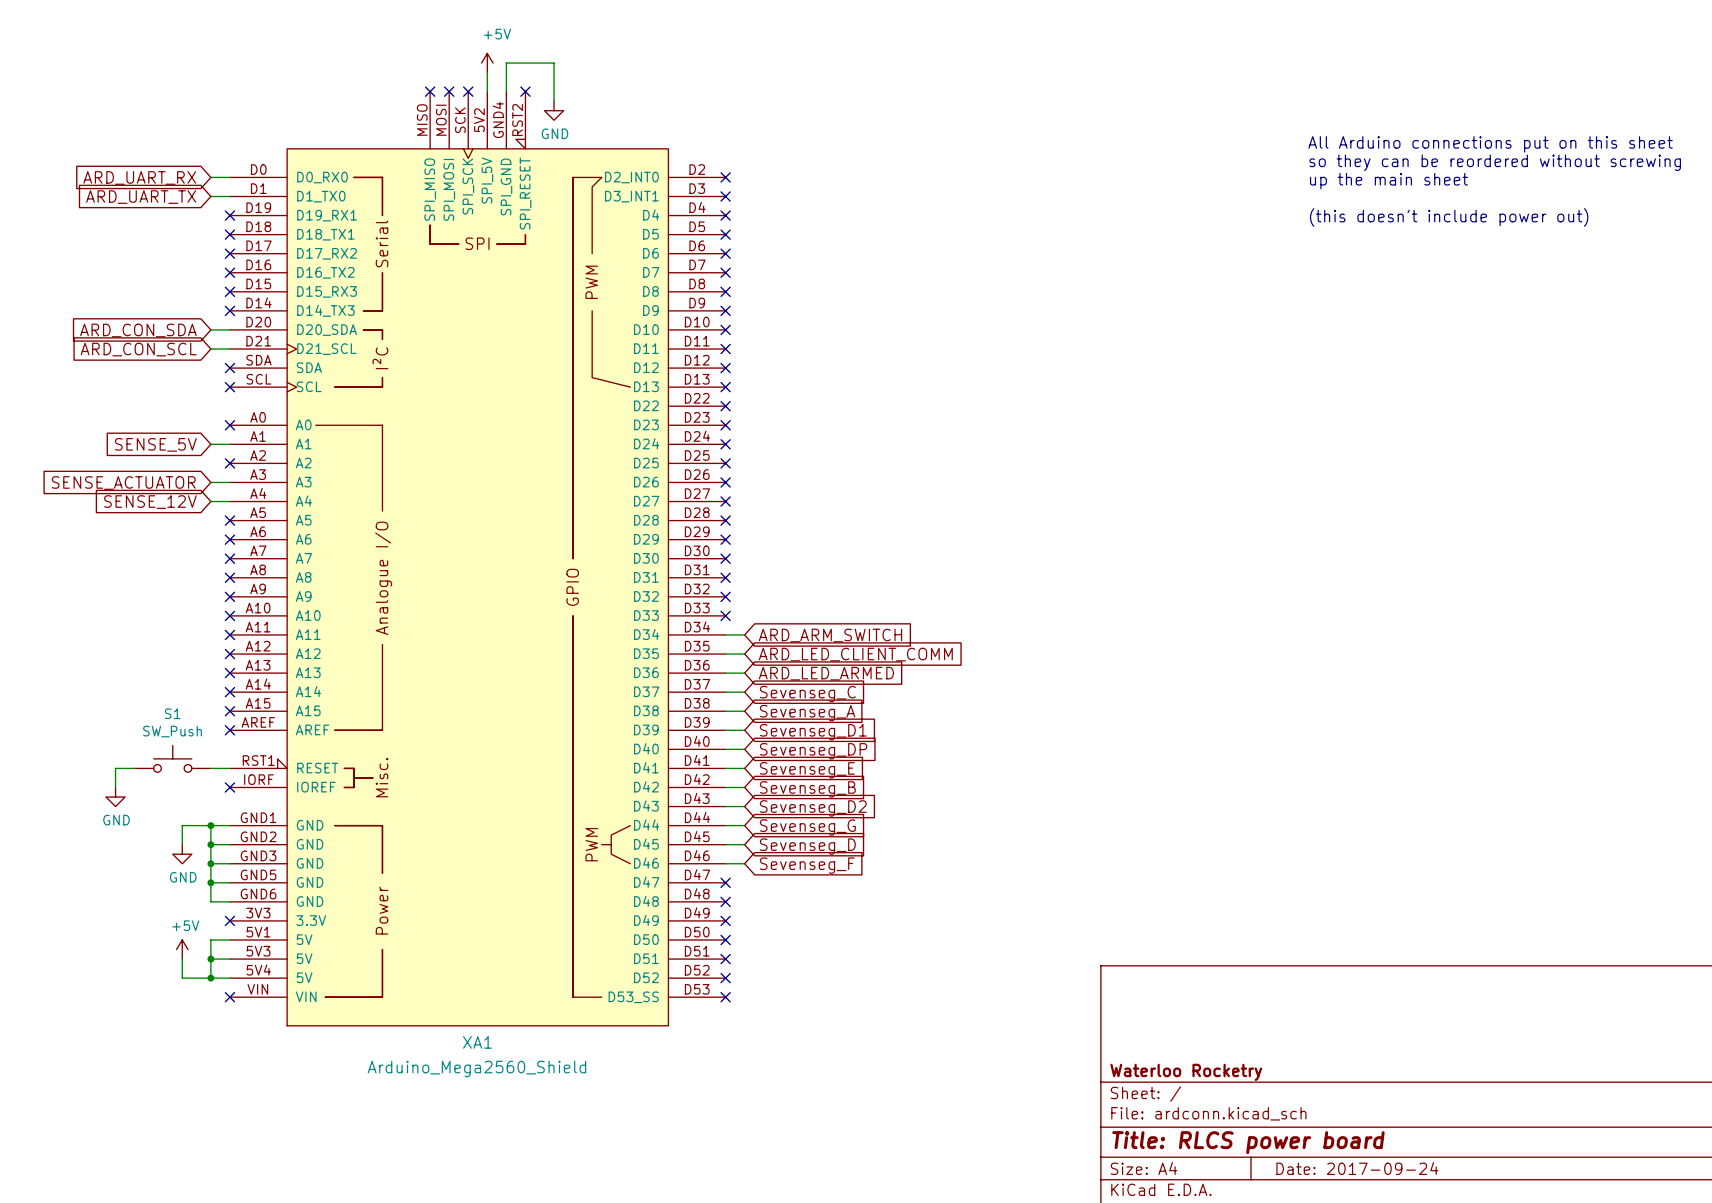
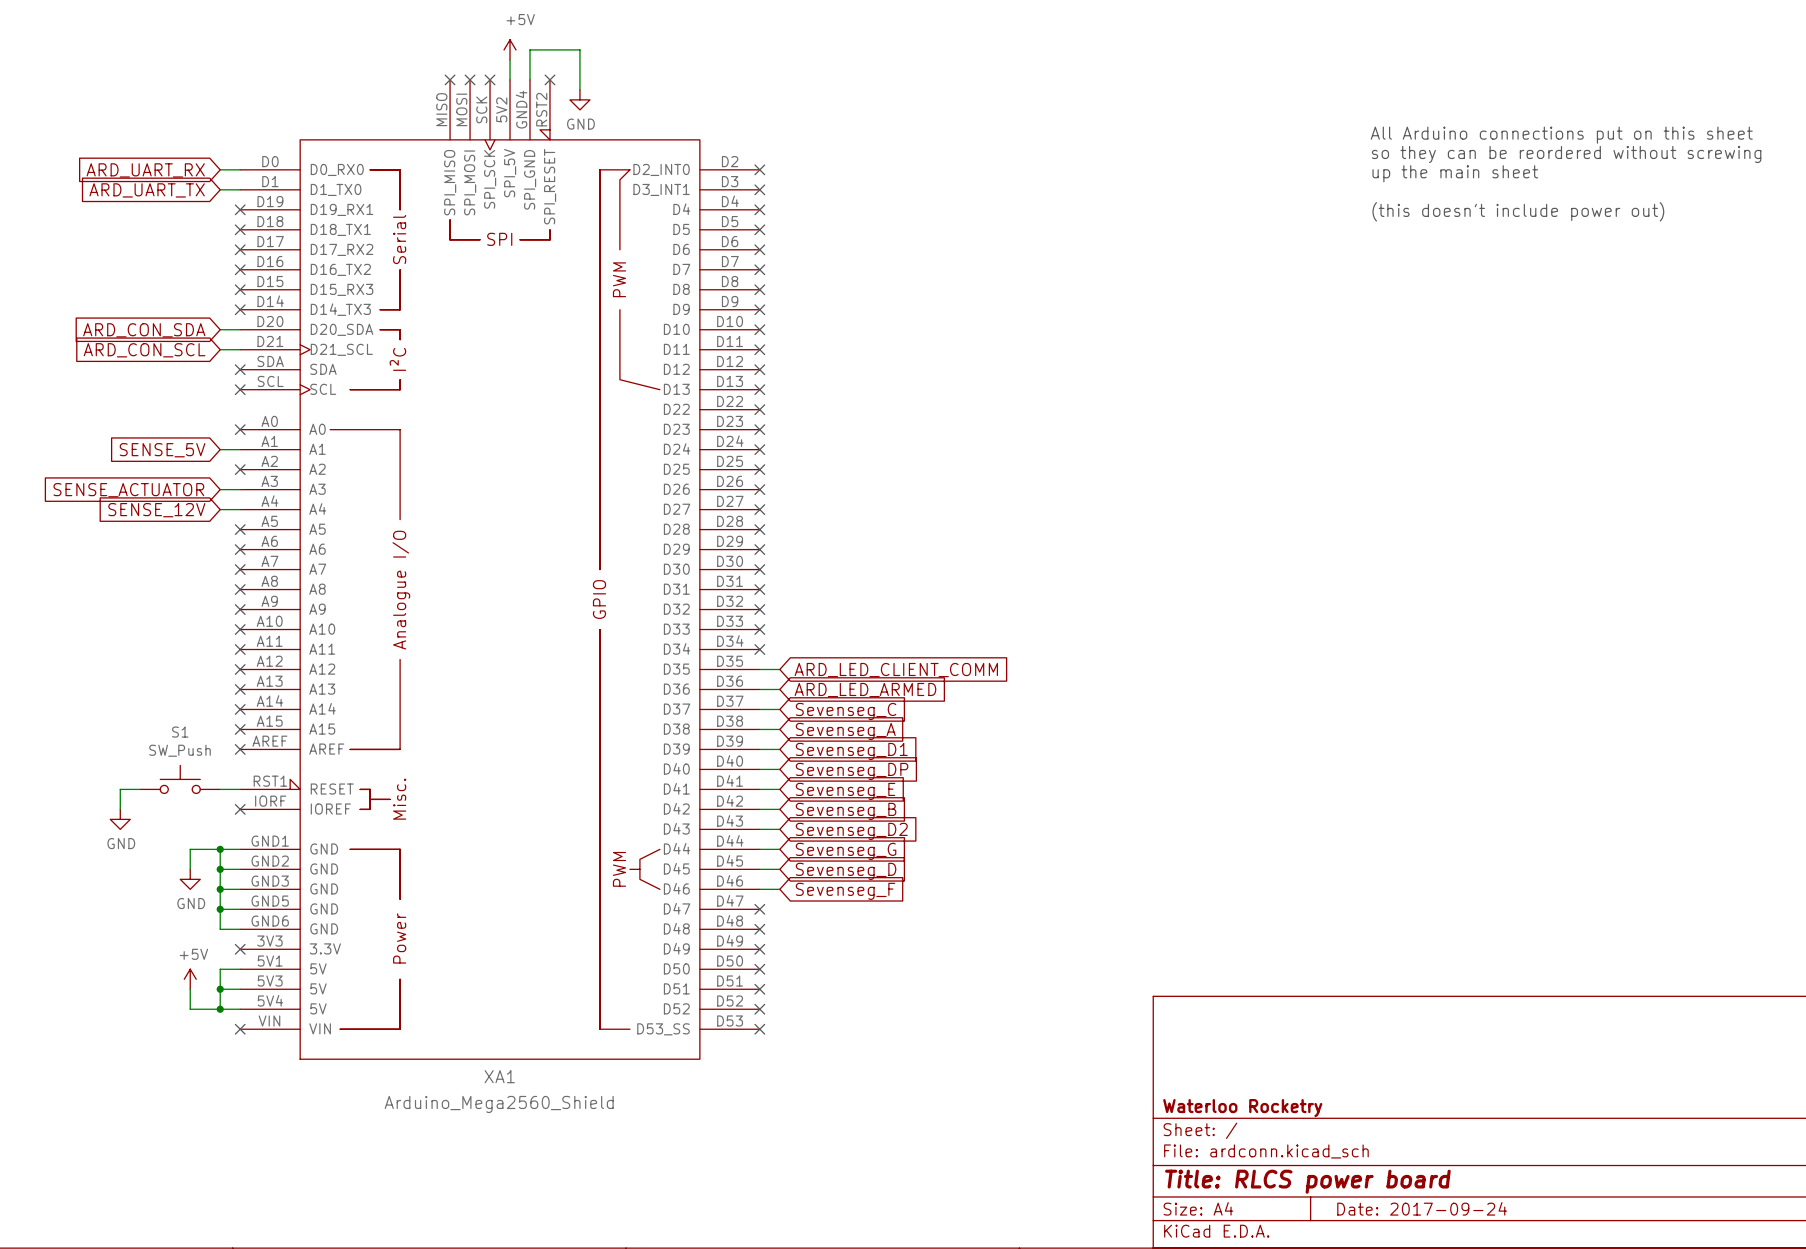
wire: (725, 634) (744, 634) -> none
no-connect mark: none -> (759, 649)
global label: ARD_ARM_SWITCH (830, 635) -> none

